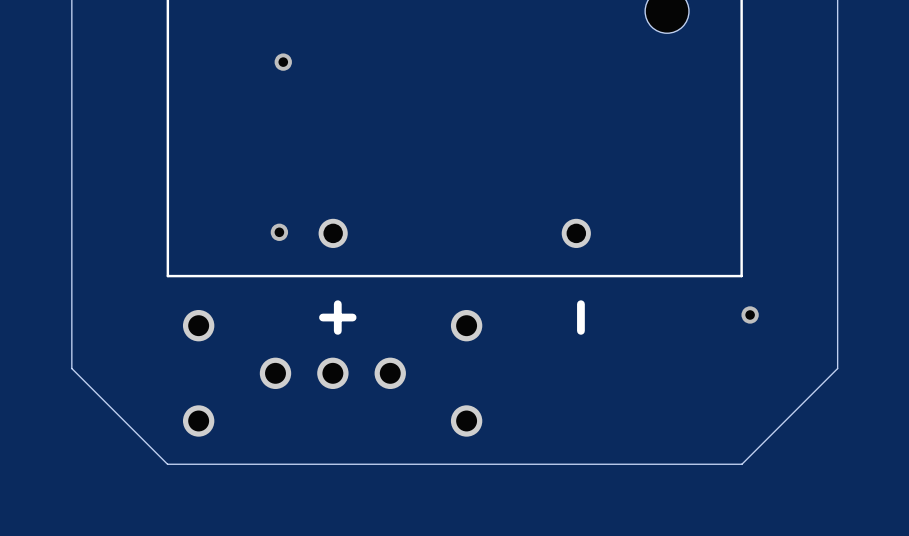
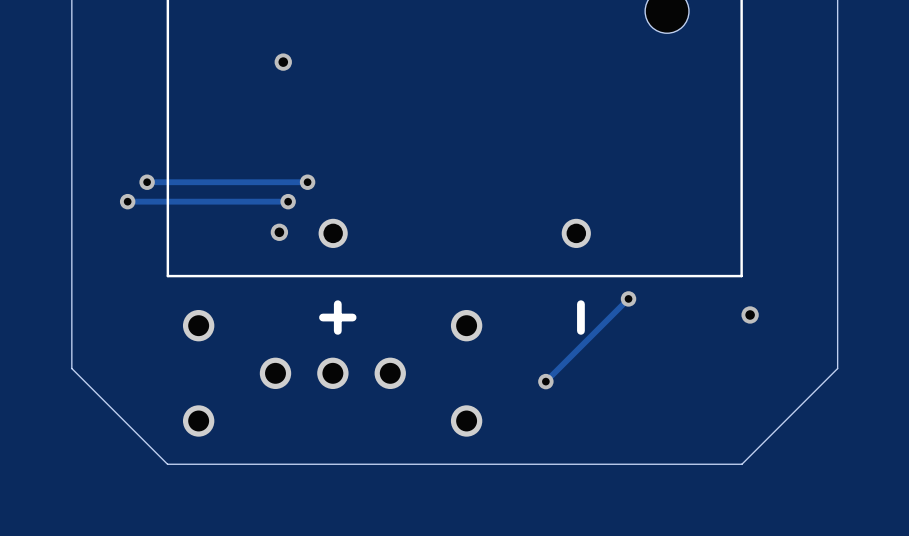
via: none -> (147, 182)
track: none -> (307, 182) (147, 182)
via: none -> (307, 182)
via: none -> (127, 201)
track: none -> (288, 201) (127, 201)
via: none -> (288, 201)
track: none -> (628, 298) (545, 381)
via: none -> (628, 298)
via: none -> (545, 381)

